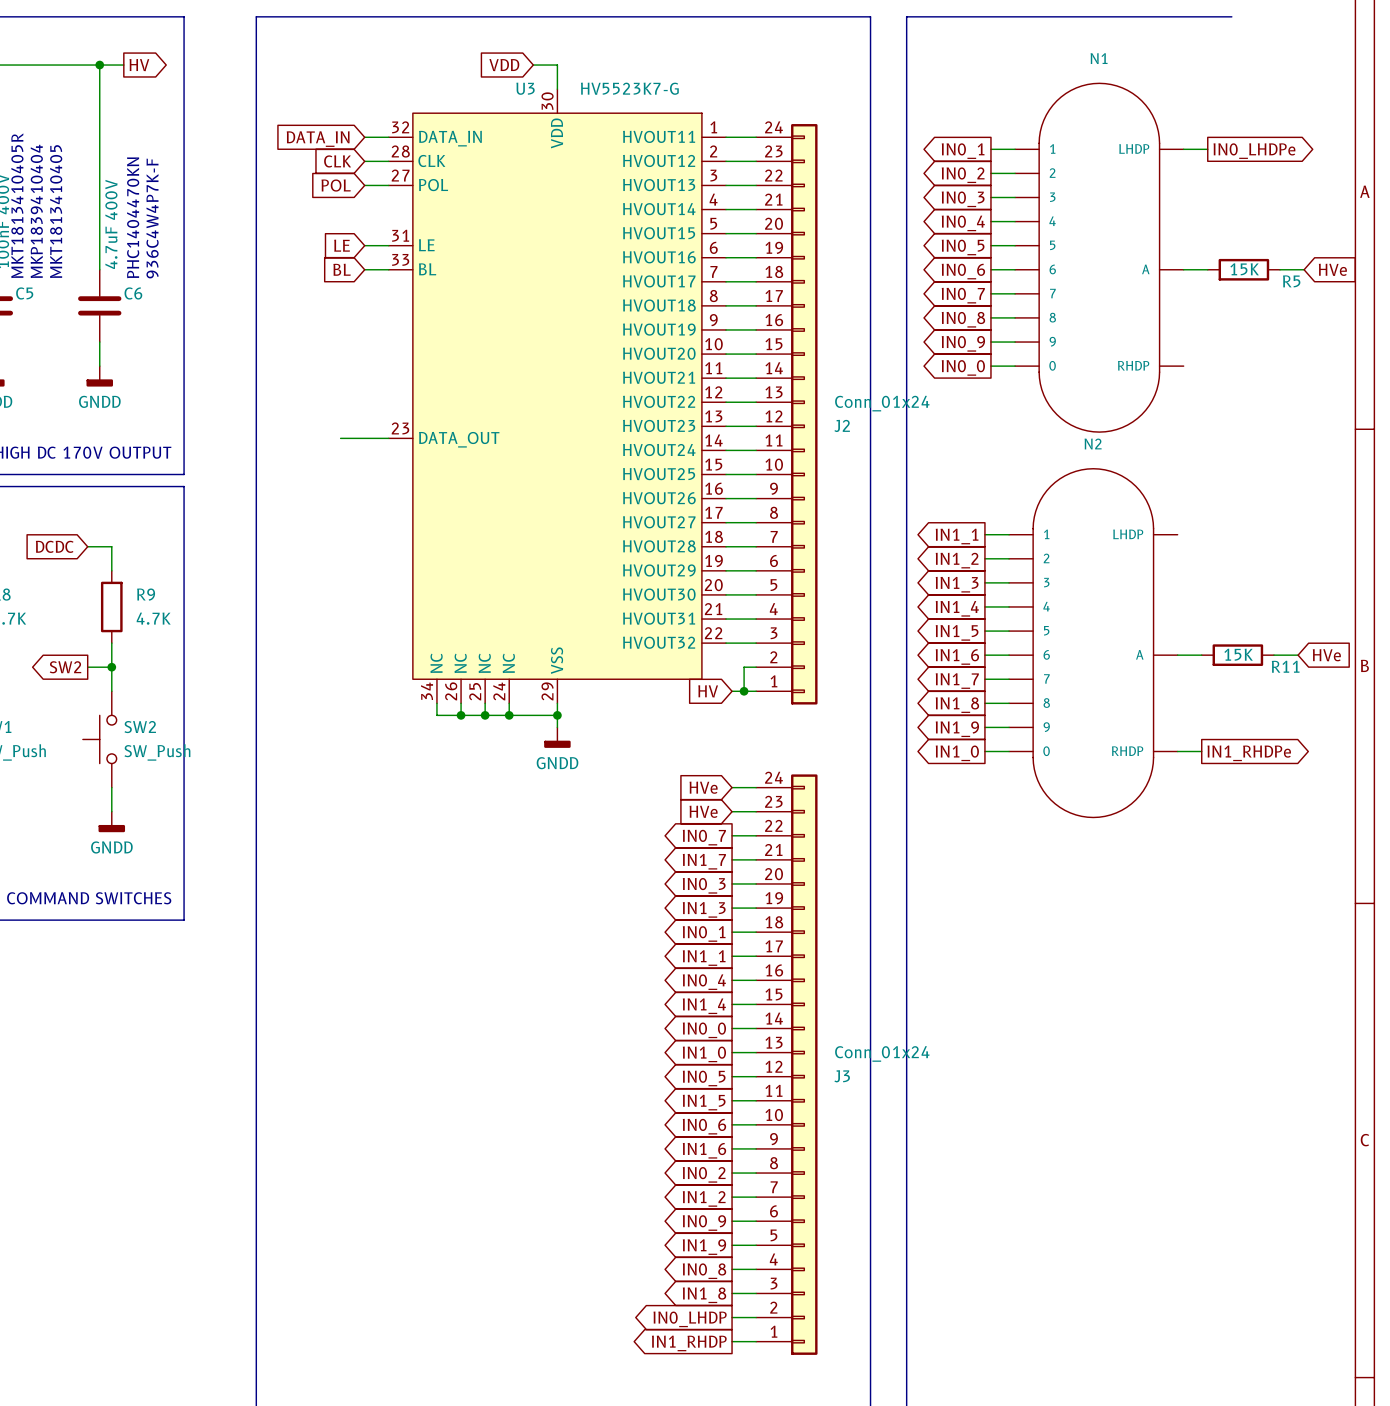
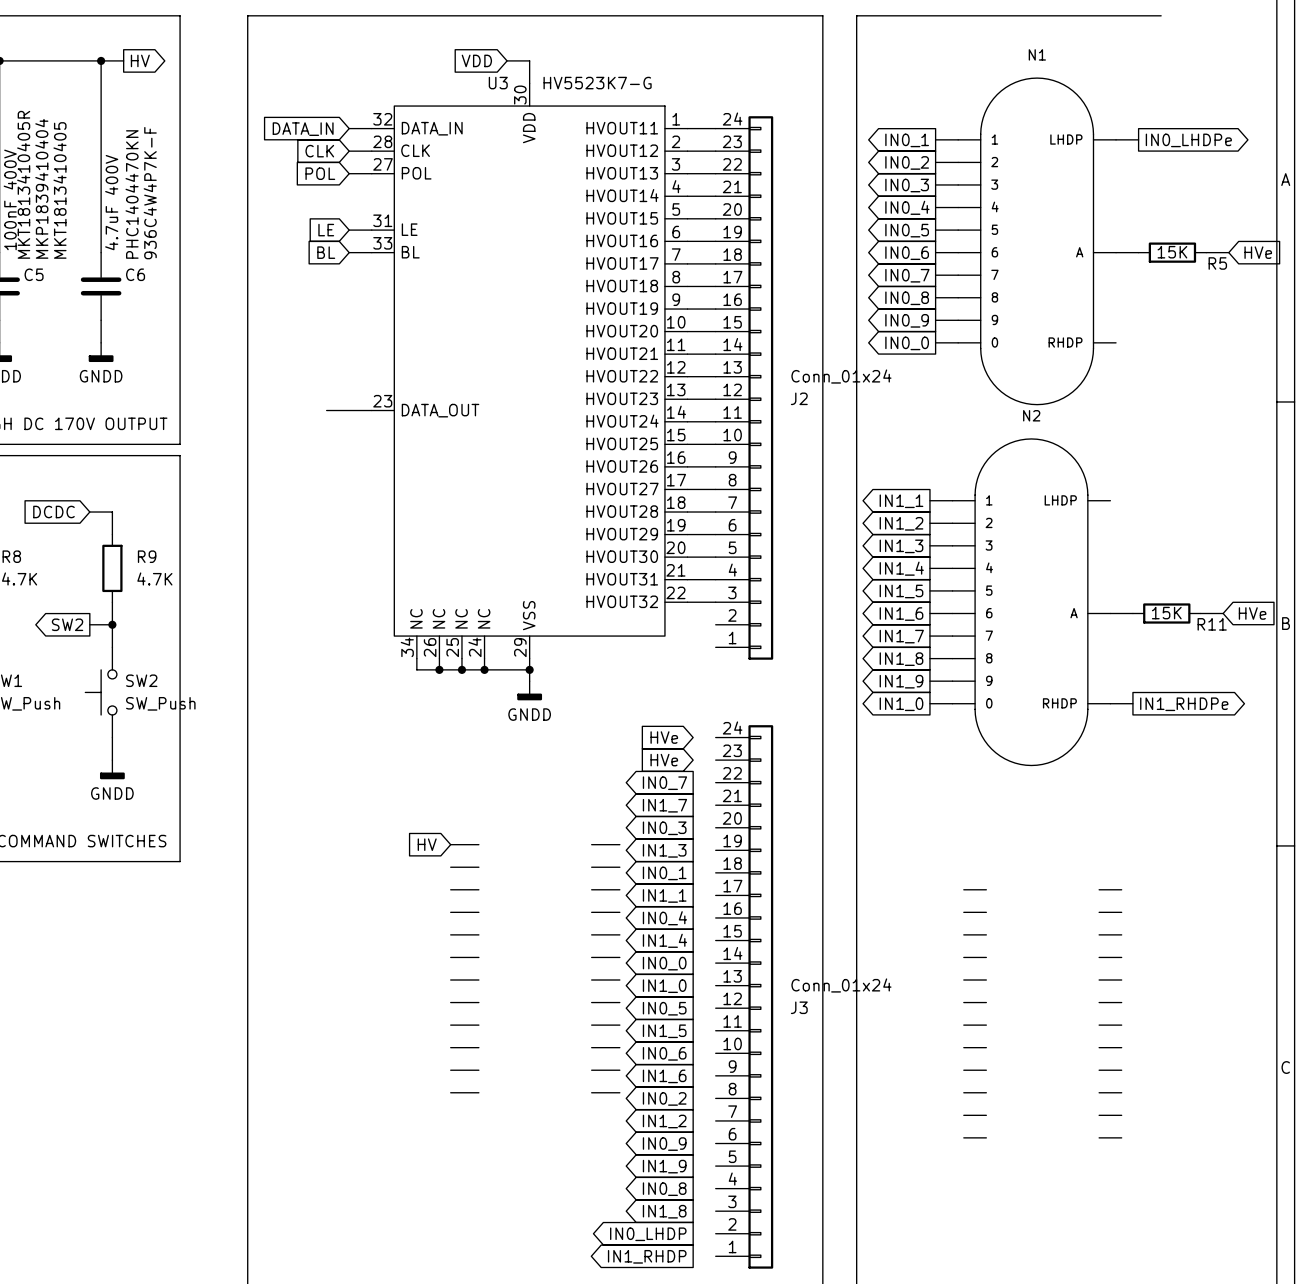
wire: (756, 667) (744, 667) (744, 691) -> none
global label: HV (708, 691) -> none
wire: (732, 691) (756, 691) -> none
junction: (744, 691) -> none
wire: (732, 787) (756, 787) -> none
wire: (732, 811) (756, 811) -> none
wire: (732, 835) (756, 835) -> none
wire: (732, 859) (756, 859) -> none
wire: (732, 883) (756, 883) -> none
global label: none -> HV (427, 844)
wire: none -> (450, 844) (478, 844)
wire: none -> (591, 844) (619, 844)
wire: (732, 908) (756, 908) -> none
wire: none -> (450, 867) (478, 867)
wire: none -> (591, 867) (619, 867)
wire: (732, 932) (756, 932) -> none
wire: none -> (450, 889) (478, 889)
wire: none -> (591, 889) (619, 889)
wire: none -> (963, 889) (986, 889)
wire: none -> (1099, 889) (1121, 889)
wire: (732, 956) (756, 956) -> none
wire: none -> (450, 912) (478, 912)
wire: none -> (591, 912) (619, 912)
wire: none -> (963, 912) (986, 912)
wire: none -> (1099, 912) (1121, 912)
wire: (732, 980) (756, 980) -> none
wire: none -> (450, 934) (478, 934)
wire: none -> (591, 934) (619, 934)
wire: none -> (963, 934) (986, 934)
wire: none -> (1099, 934) (1121, 934)
wire: (732, 1004) (756, 1004) -> none
wire: none -> (450, 957) (478, 957)
wire: none -> (591, 957) (619, 957)
wire: none -> (963, 957) (986, 957)
wire: none -> (1099, 957) (1121, 957)
wire: (732, 1028) (756, 1028) -> none
wire: none -> (450, 980) (478, 980)
wire: none -> (591, 980) (619, 980)
wire: none -> (963, 980) (986, 980)
wire: none -> (1099, 980) (1121, 980)
wire: (732, 1052) (756, 1052) -> none
wire: none -> (450, 1002) (478, 1002)
wire: none -> (591, 1002) (619, 1002)
wire: none -> (963, 1002) (986, 1002)
wire: none -> (1099, 1002) (1121, 1002)
wire: (732, 1076) (756, 1076) -> none
wire: none -> (450, 1025) (478, 1025)
wire: none -> (591, 1025) (619, 1025)
wire: none -> (963, 1025) (986, 1025)
wire: none -> (1099, 1025) (1121, 1025)
wire: (732, 1100) (756, 1100) -> none
wire: none -> (450, 1047) (478, 1047)
wire: none -> (591, 1047) (619, 1047)
wire: none -> (963, 1047) (986, 1047)
wire: none -> (1099, 1047) (1121, 1047)
wire: (732, 1124) (756, 1124) -> none
wire: none -> (450, 1070) (478, 1070)
wire: none -> (591, 1070) (619, 1070)
wire: none -> (963, 1070) (986, 1070)
wire: none -> (1099, 1070) (1121, 1070)
wire: (732, 1148) (756, 1148) -> none
wire: none -> (450, 1092) (478, 1092)
wire: none -> (591, 1092) (619, 1092)
wire: none -> (963, 1092) (986, 1092)
wire: none -> (1099, 1092) (1121, 1092)
wire: (732, 1173) (756, 1173) -> none
wire: none -> (963, 1115) (986, 1115)
wire: none -> (1099, 1115) (1121, 1115)
wire: (732, 1197) (756, 1197) -> none
wire: none -> (963, 1137) (986, 1137)
wire: none -> (1099, 1137) (1121, 1137)
wire: (732, 1221) (756, 1221) -> none
wire: (732, 1245) (756, 1245) -> none
wire: (732, 1269) (756, 1269) -> none
wire: (732, 1293) (756, 1293) -> none
wire: (732, 1317) (756, 1317) -> none
wire: (732, 1341) (756, 1341) -> none

